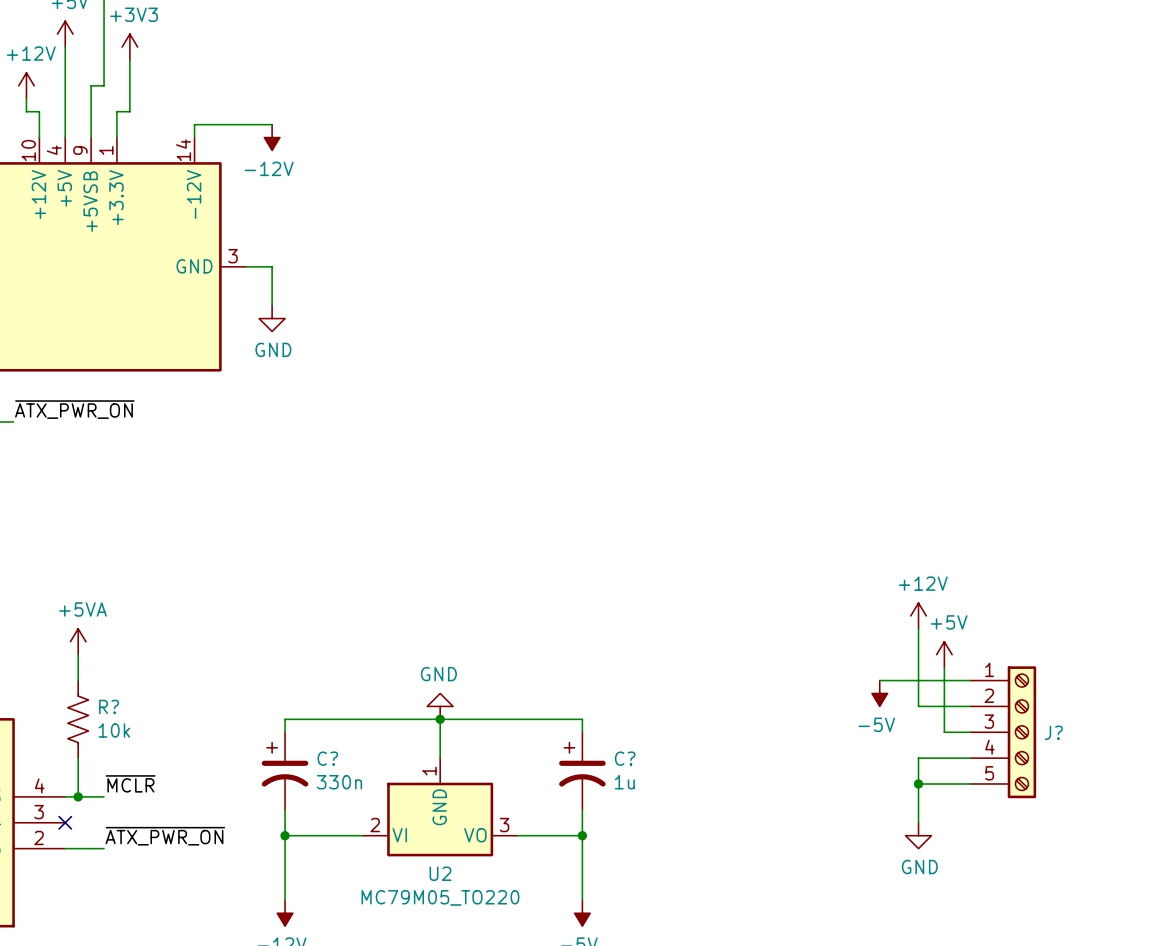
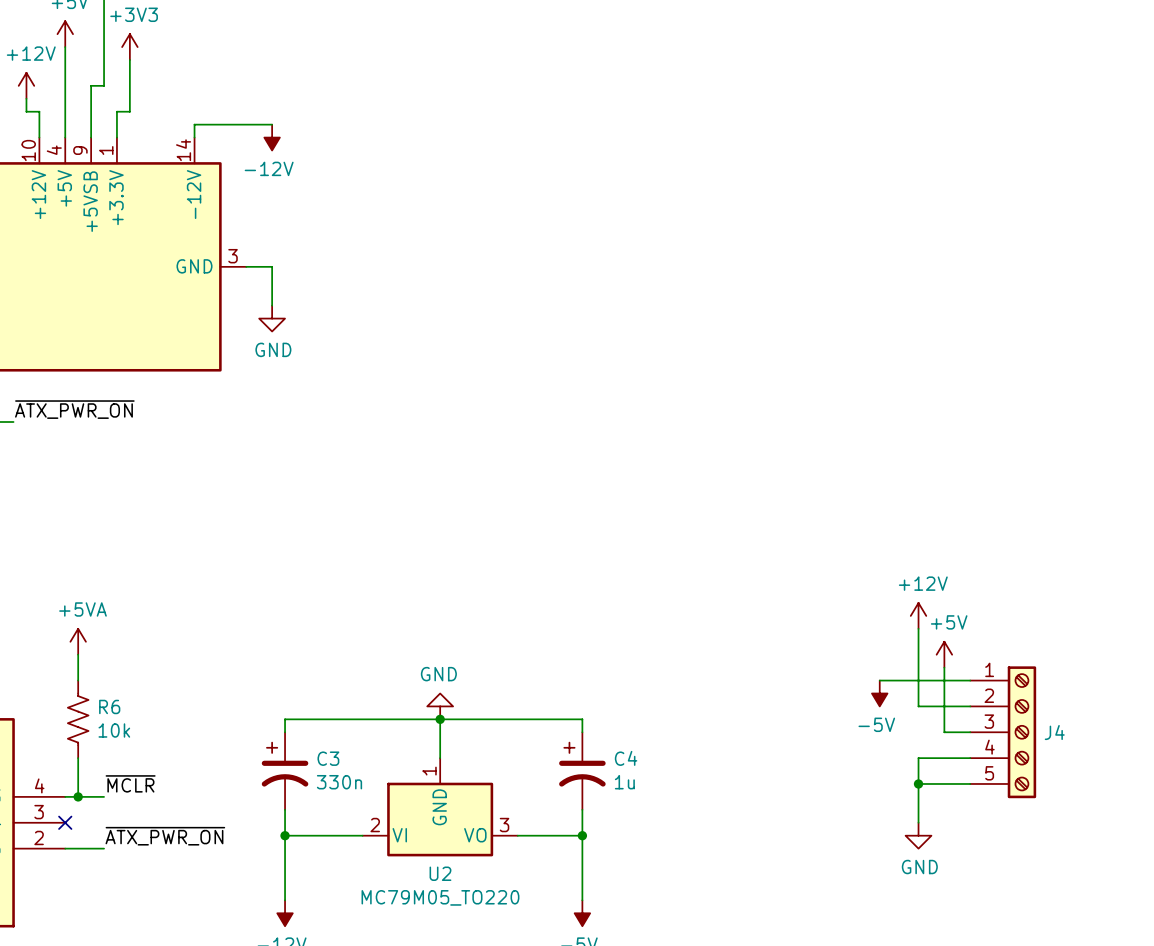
R? name: R? (109, 706) -> R6 (109, 706)
J? name: J? (1053, 732) -> J4 (1054, 732)
C? name: C? (327, 758) -> C3 (328, 758)
C? name: C? (625, 758) -> C4 (626, 758)

